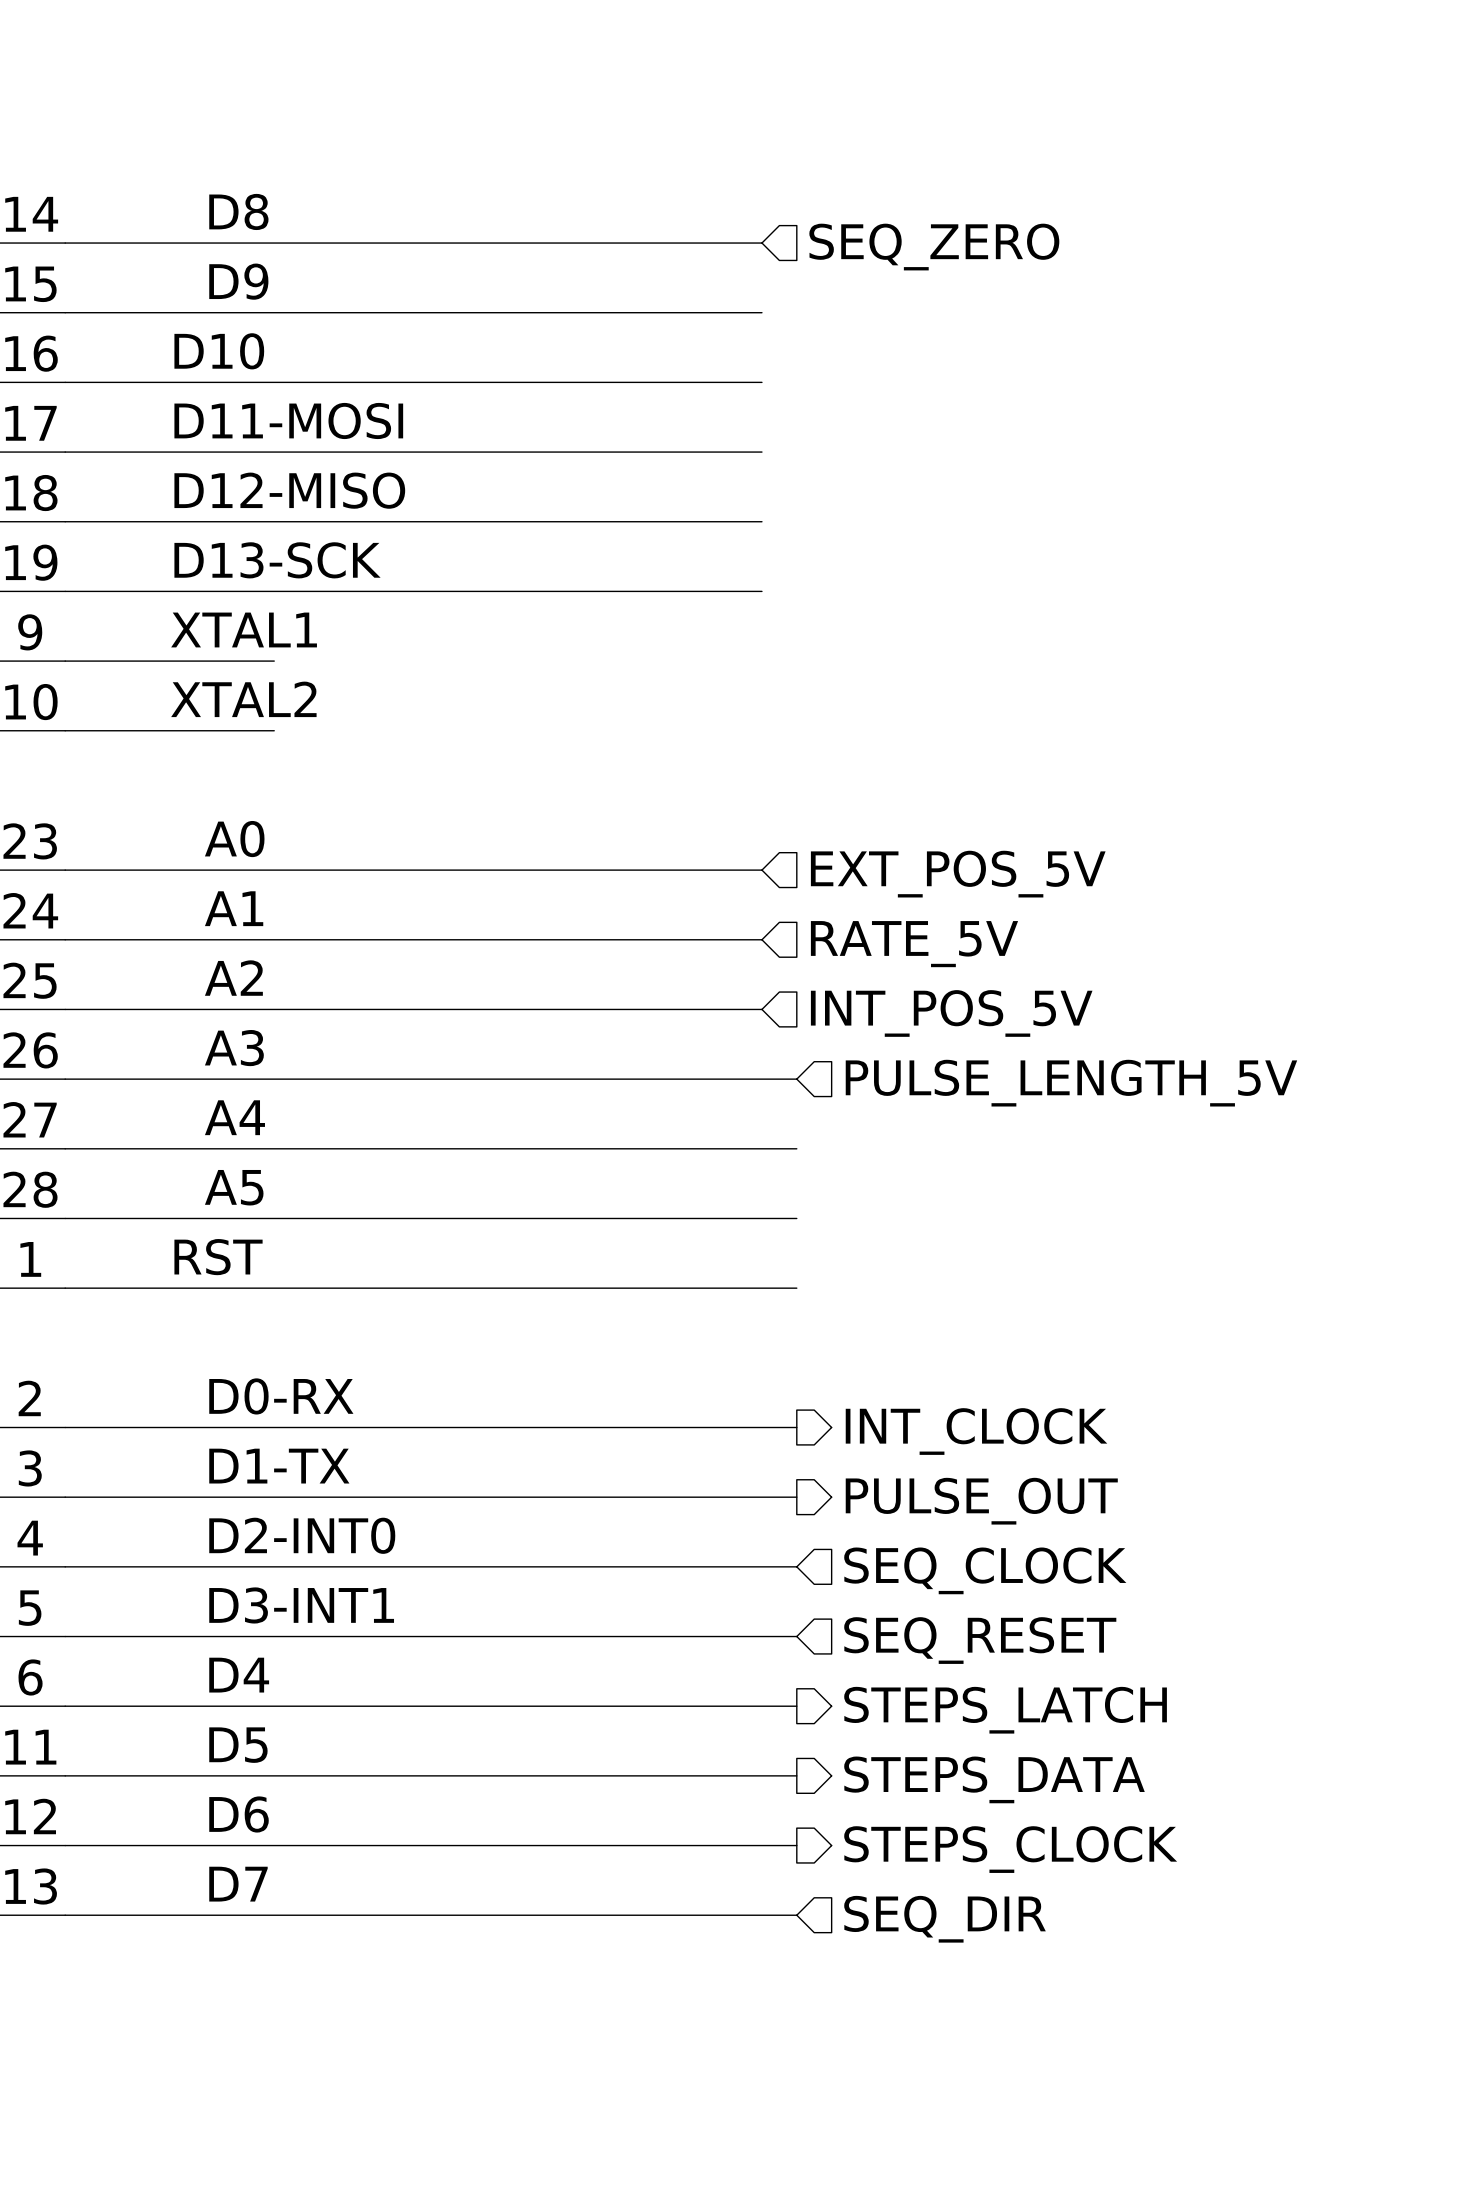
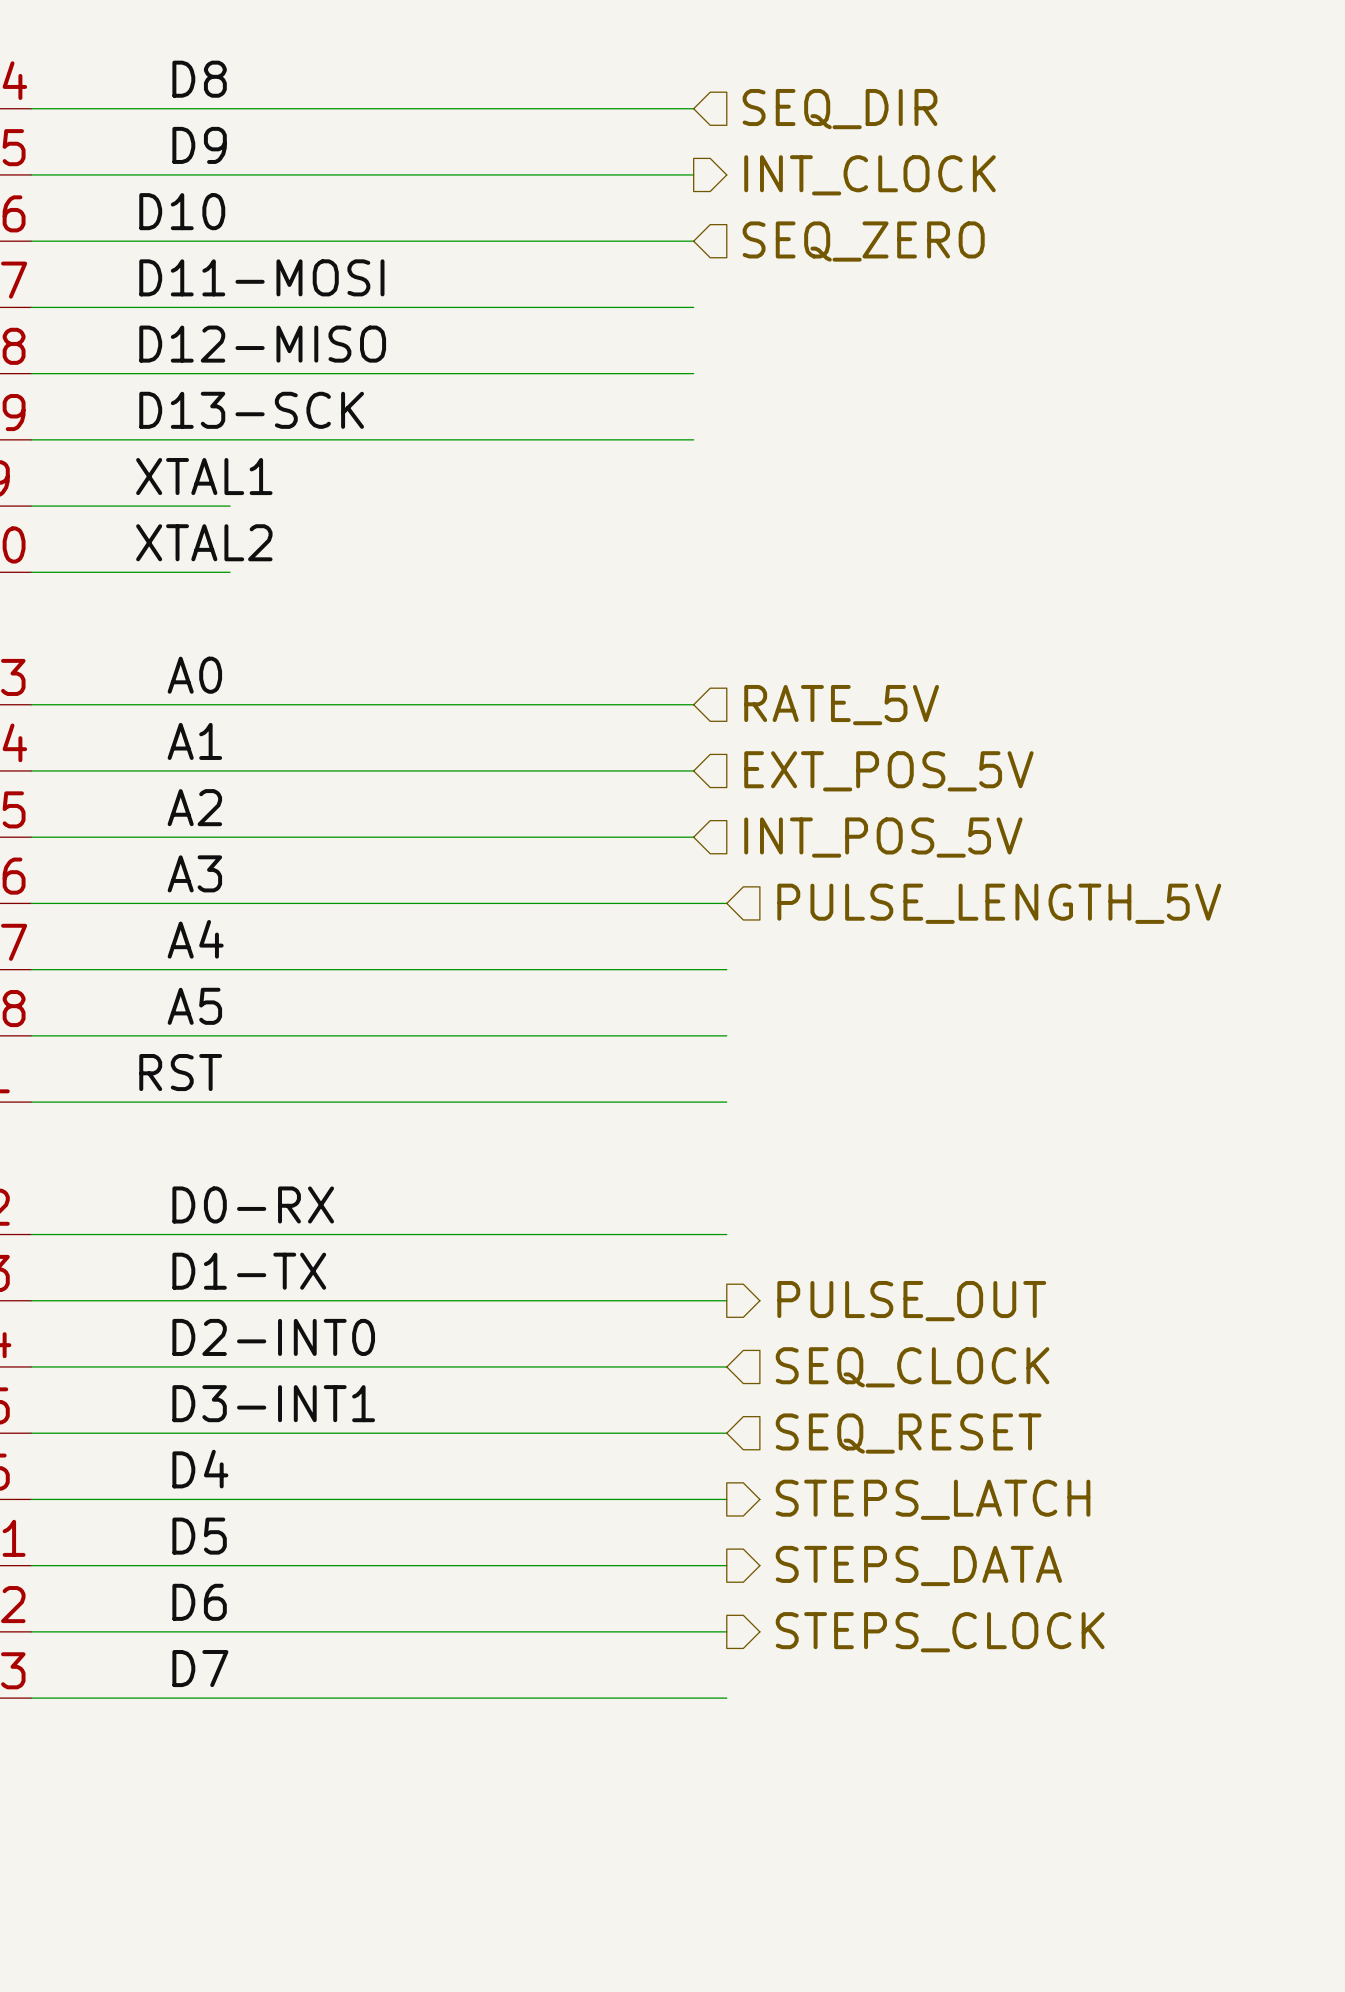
hierarchical label: SEQ_ZERO (934, 247) -> SEQ_DIR (840, 109)
hierarchical label: none -> INT_CLOCK (869, 175)
hierarchical label: none -> SEQ_ZERO (863, 241)
hierarchical label: EXT_POS_5V (958, 874) -> RATE_5V (841, 705)
hierarchical label: RATE_5V (914, 944) -> EXT_POS_5V (888, 771)
hierarchical label: INT_CLOCK (976, 1431) -> none
hierarchical label: SEQ_DIR (945, 1919) -> none

